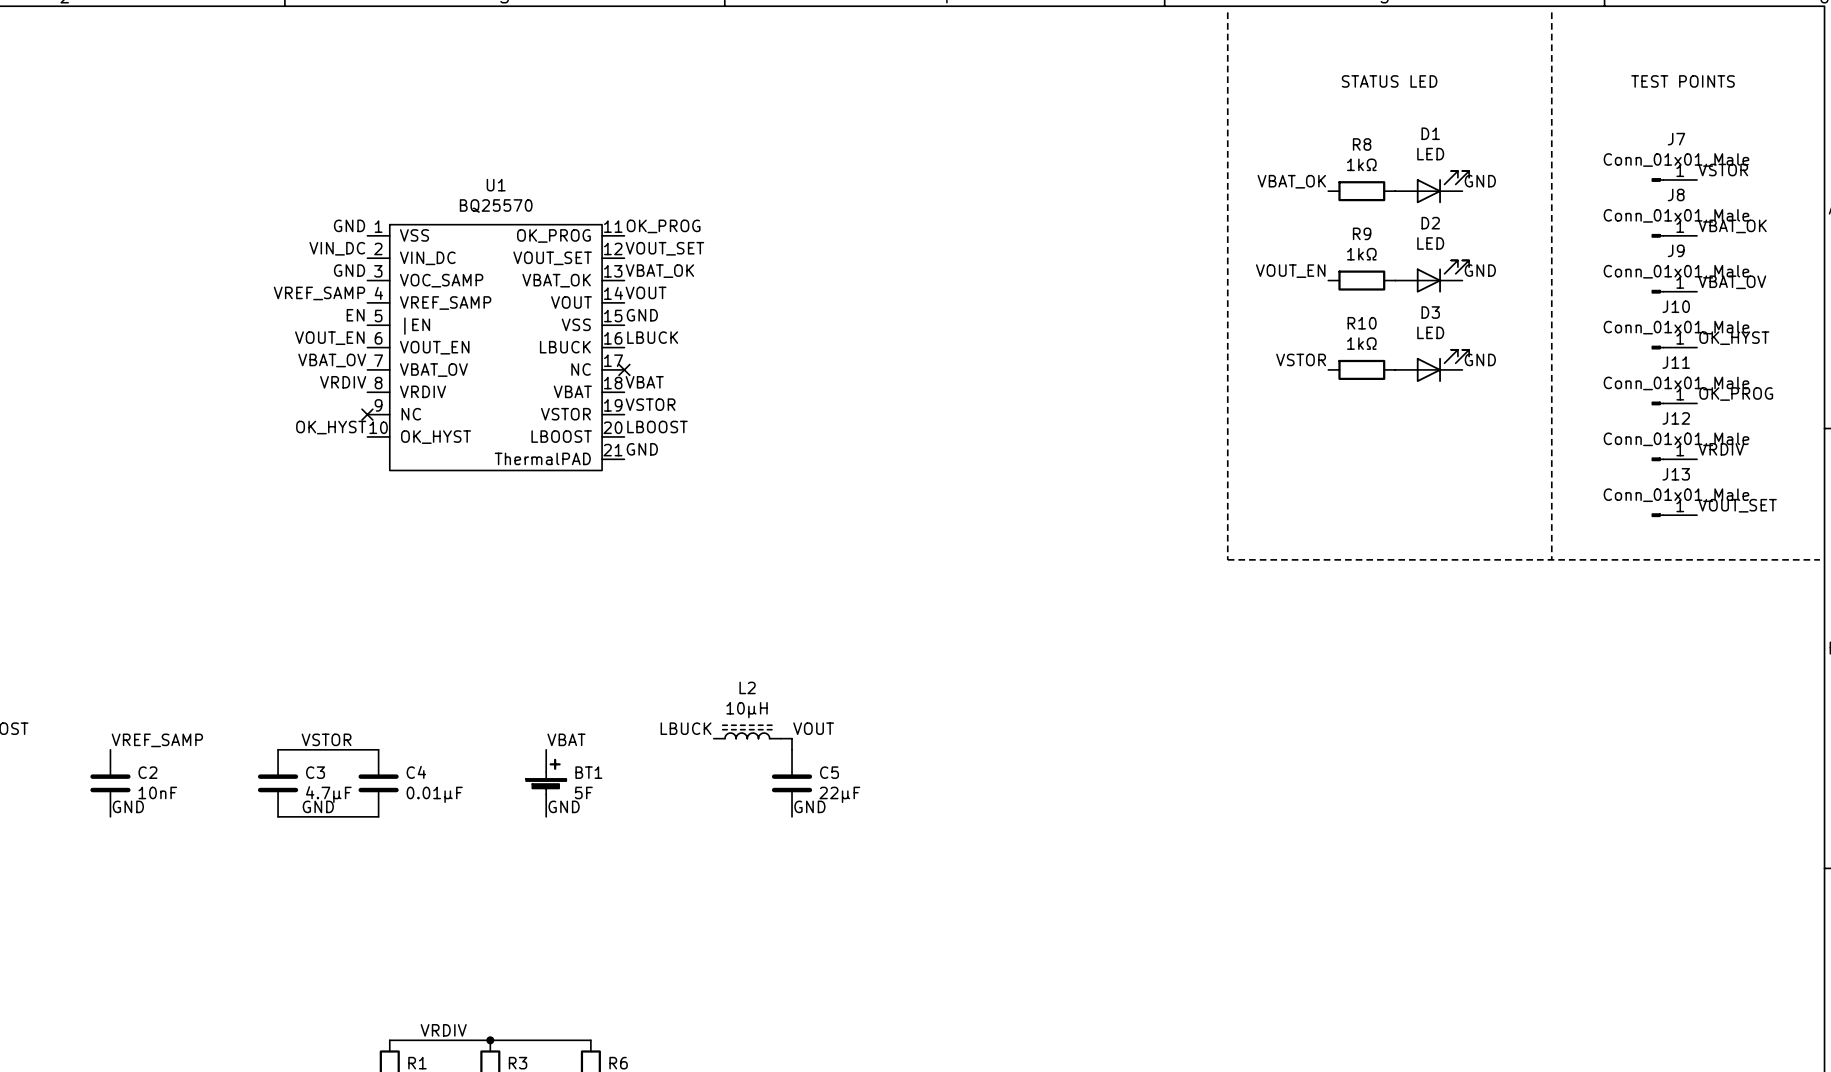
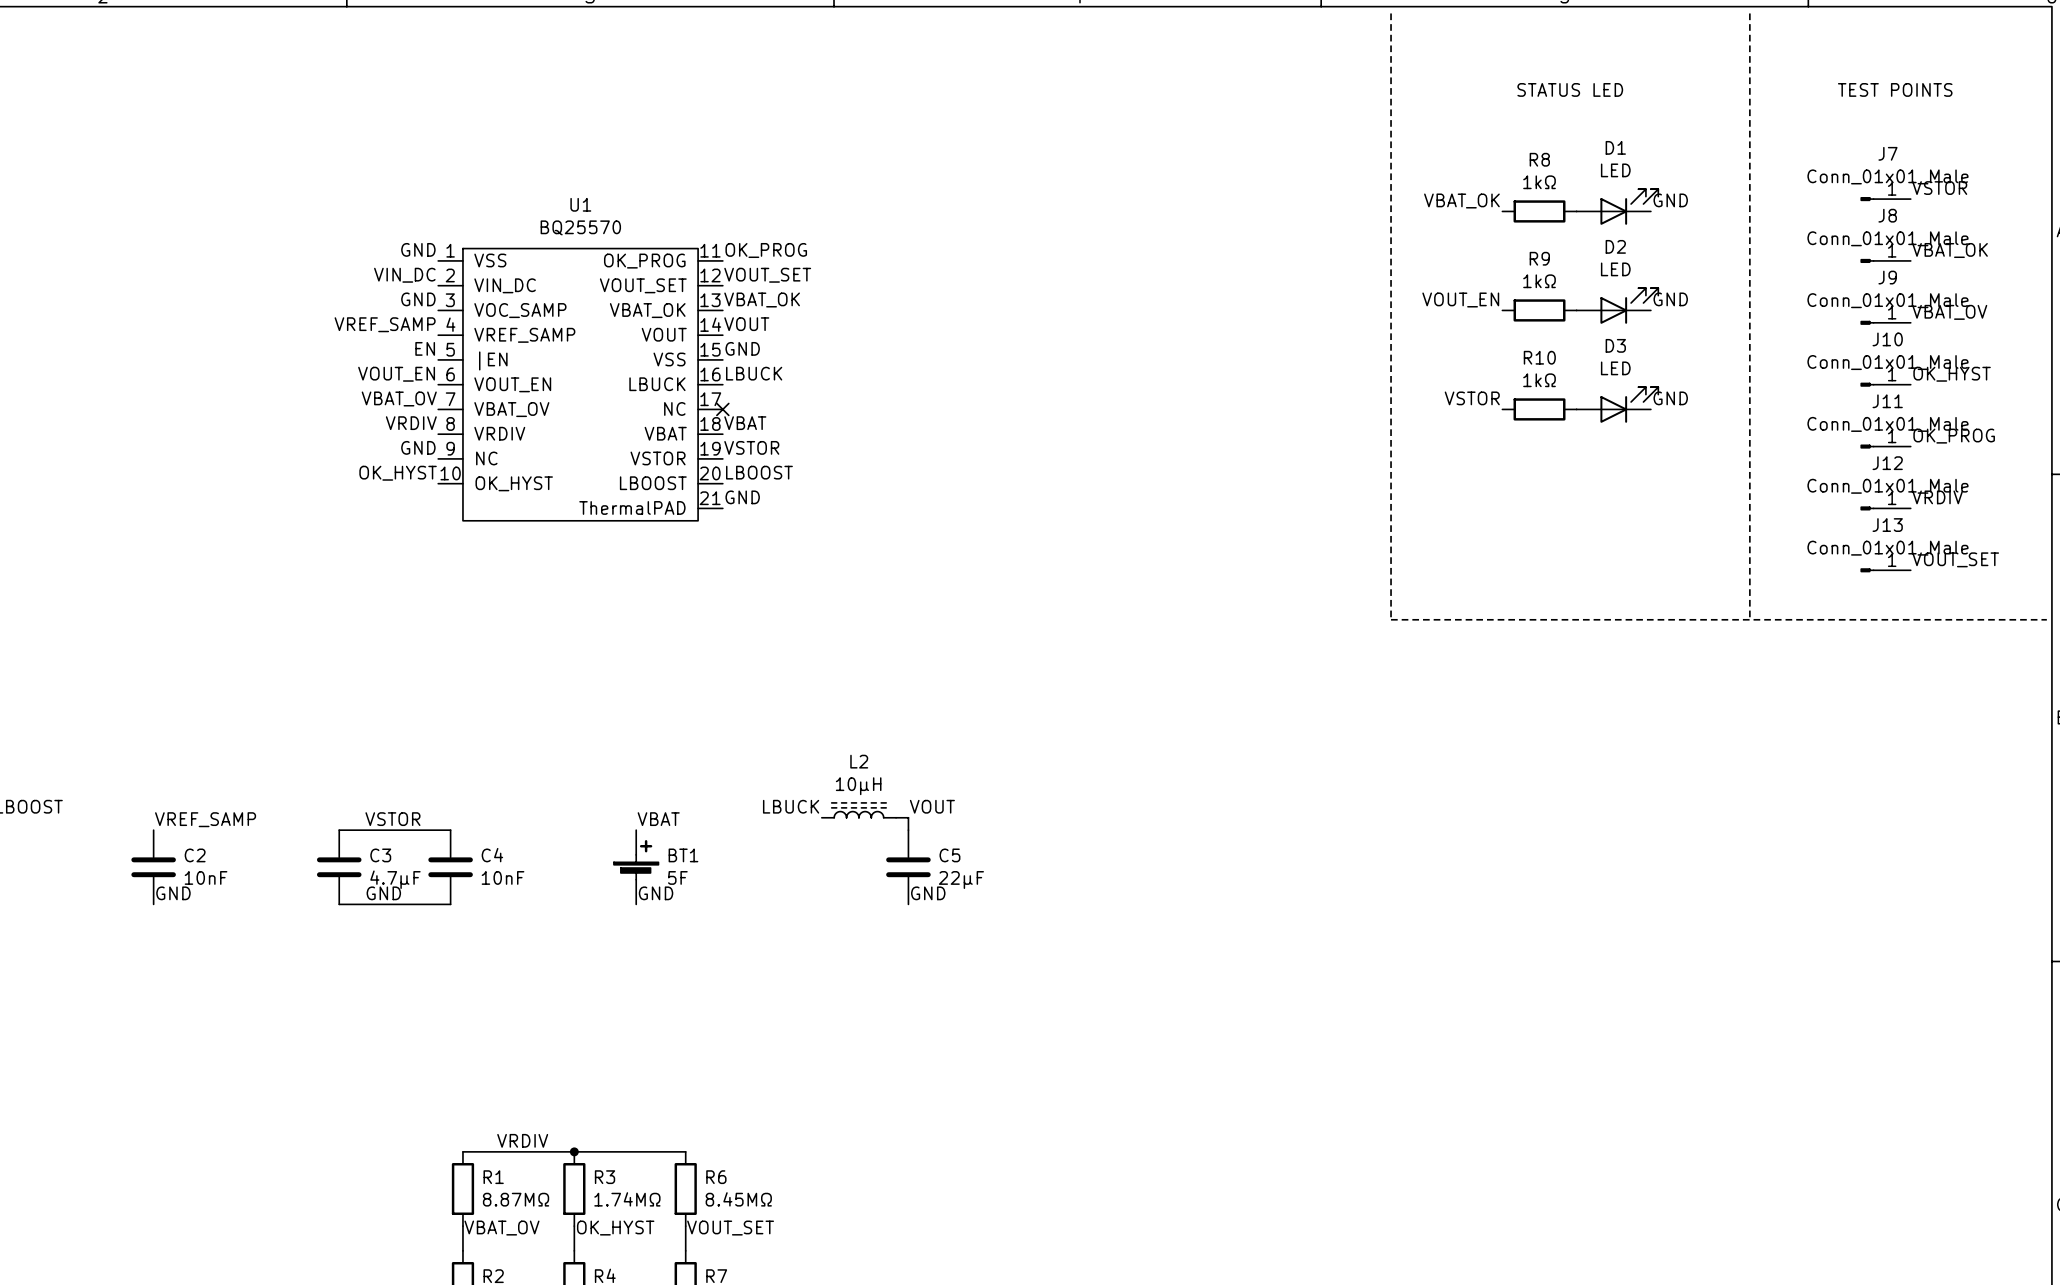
label: none -> GND (418, 447)
no-connect mark: (367, 414) -> none
C4 value: 0.01μF (434, 794) -> 10nF (503, 877)

